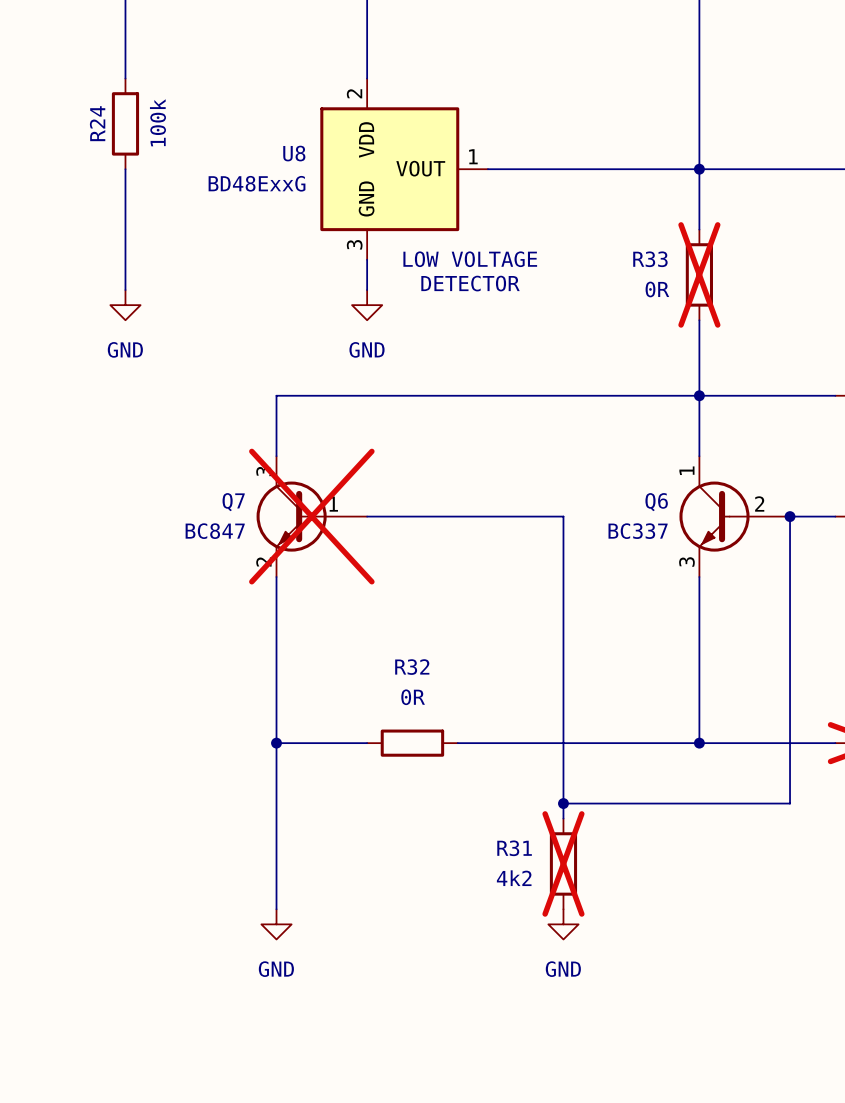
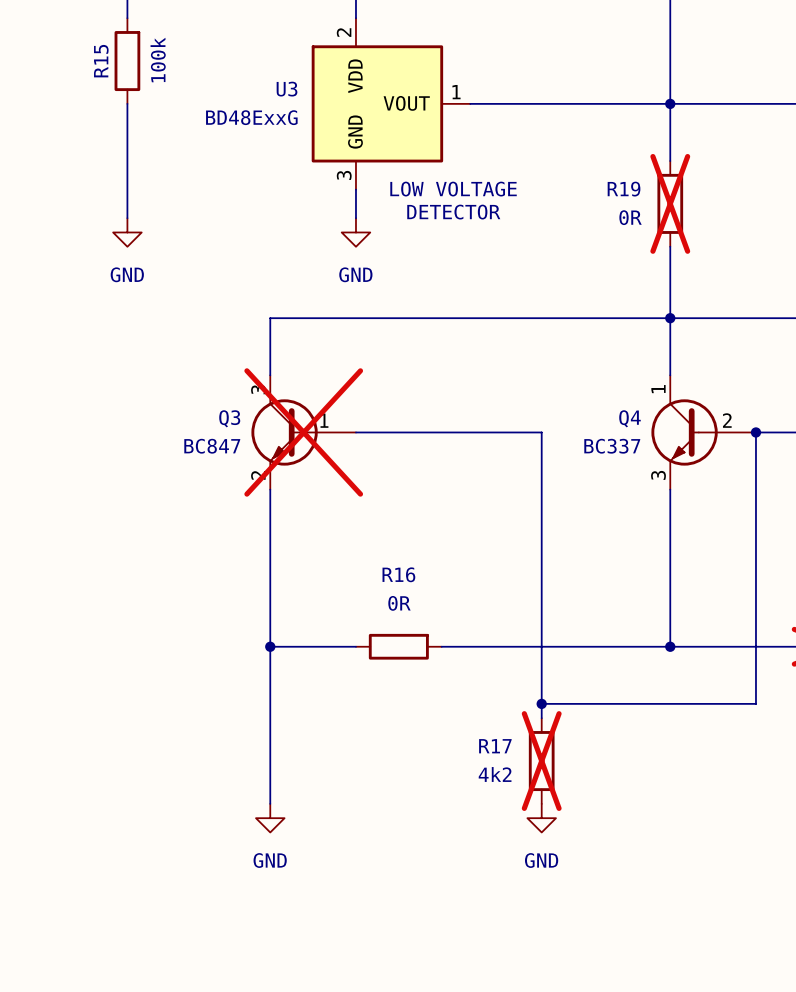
R24 name: R24 (97, 123) -> R15 (101, 61)
U8 name: U8 (294, 153) -> U3 (287, 89)
R33 name: R33 (650, 259) -> R19 (624, 189)
Q7 name: Q7 (233, 502) -> Q3 (229, 418)
Q6 name: Q6 (656, 502) -> Q4 (630, 418)
R32 name: R32 (412, 667) -> R16 (398, 574)
R31 name: R31 (514, 848) -> R17 (495, 746)

